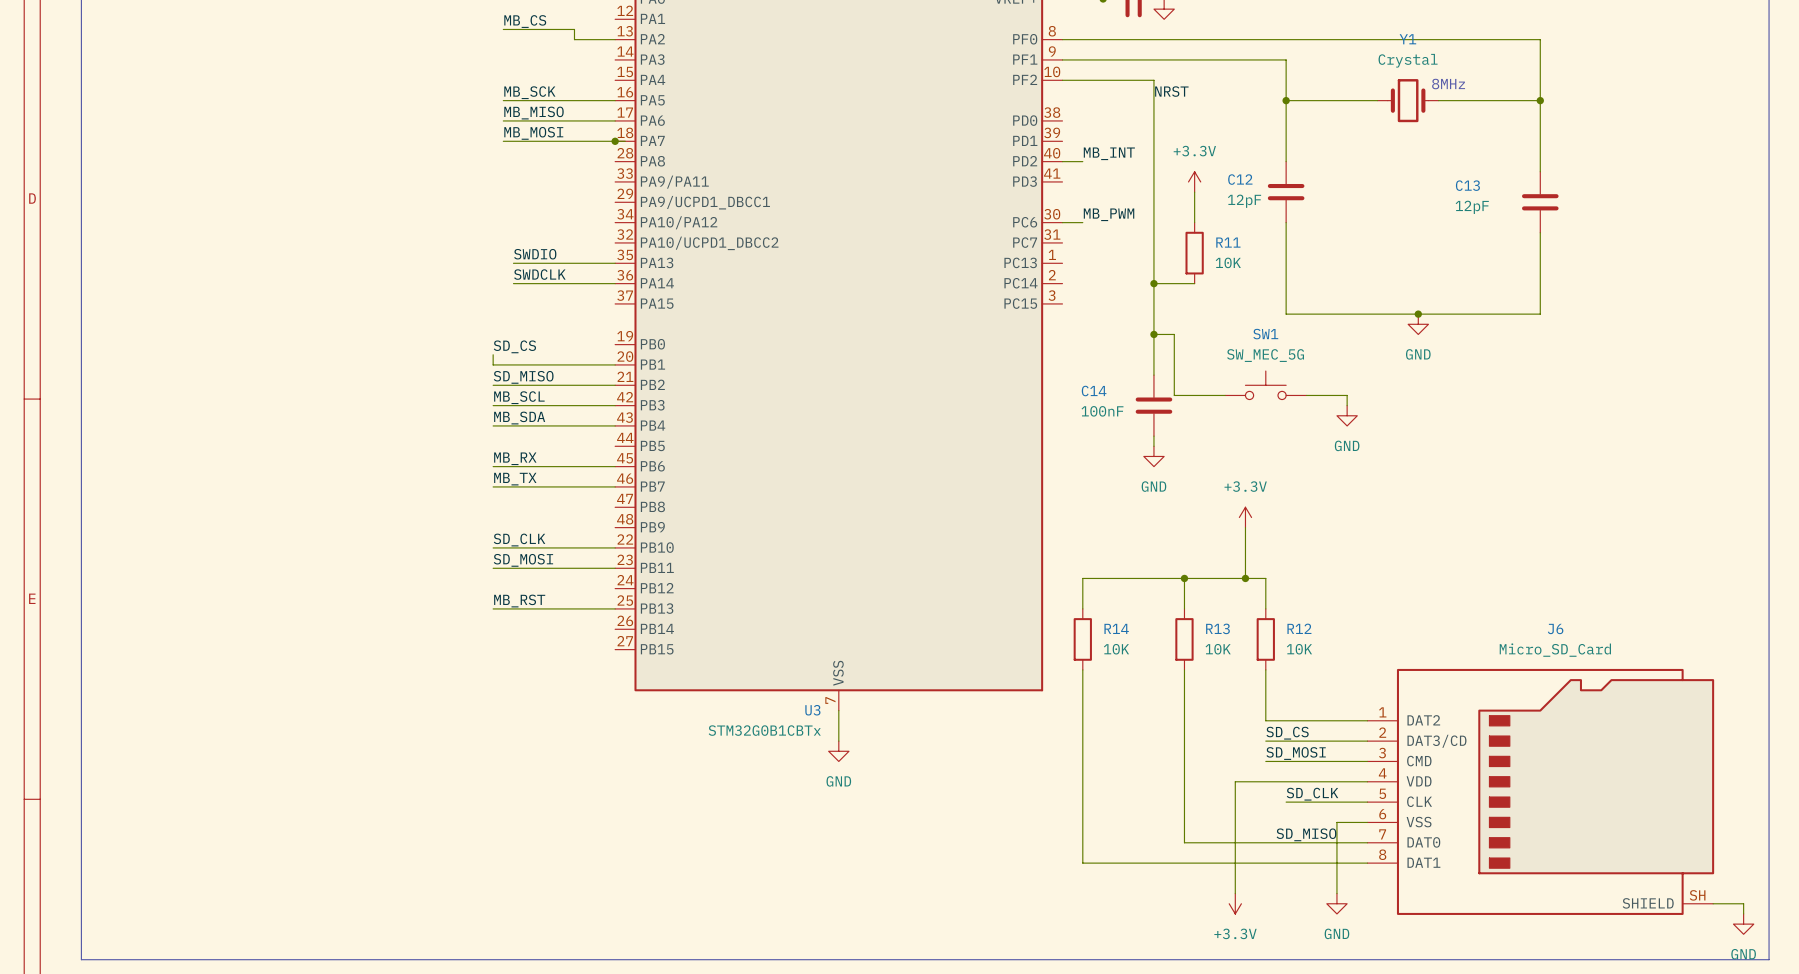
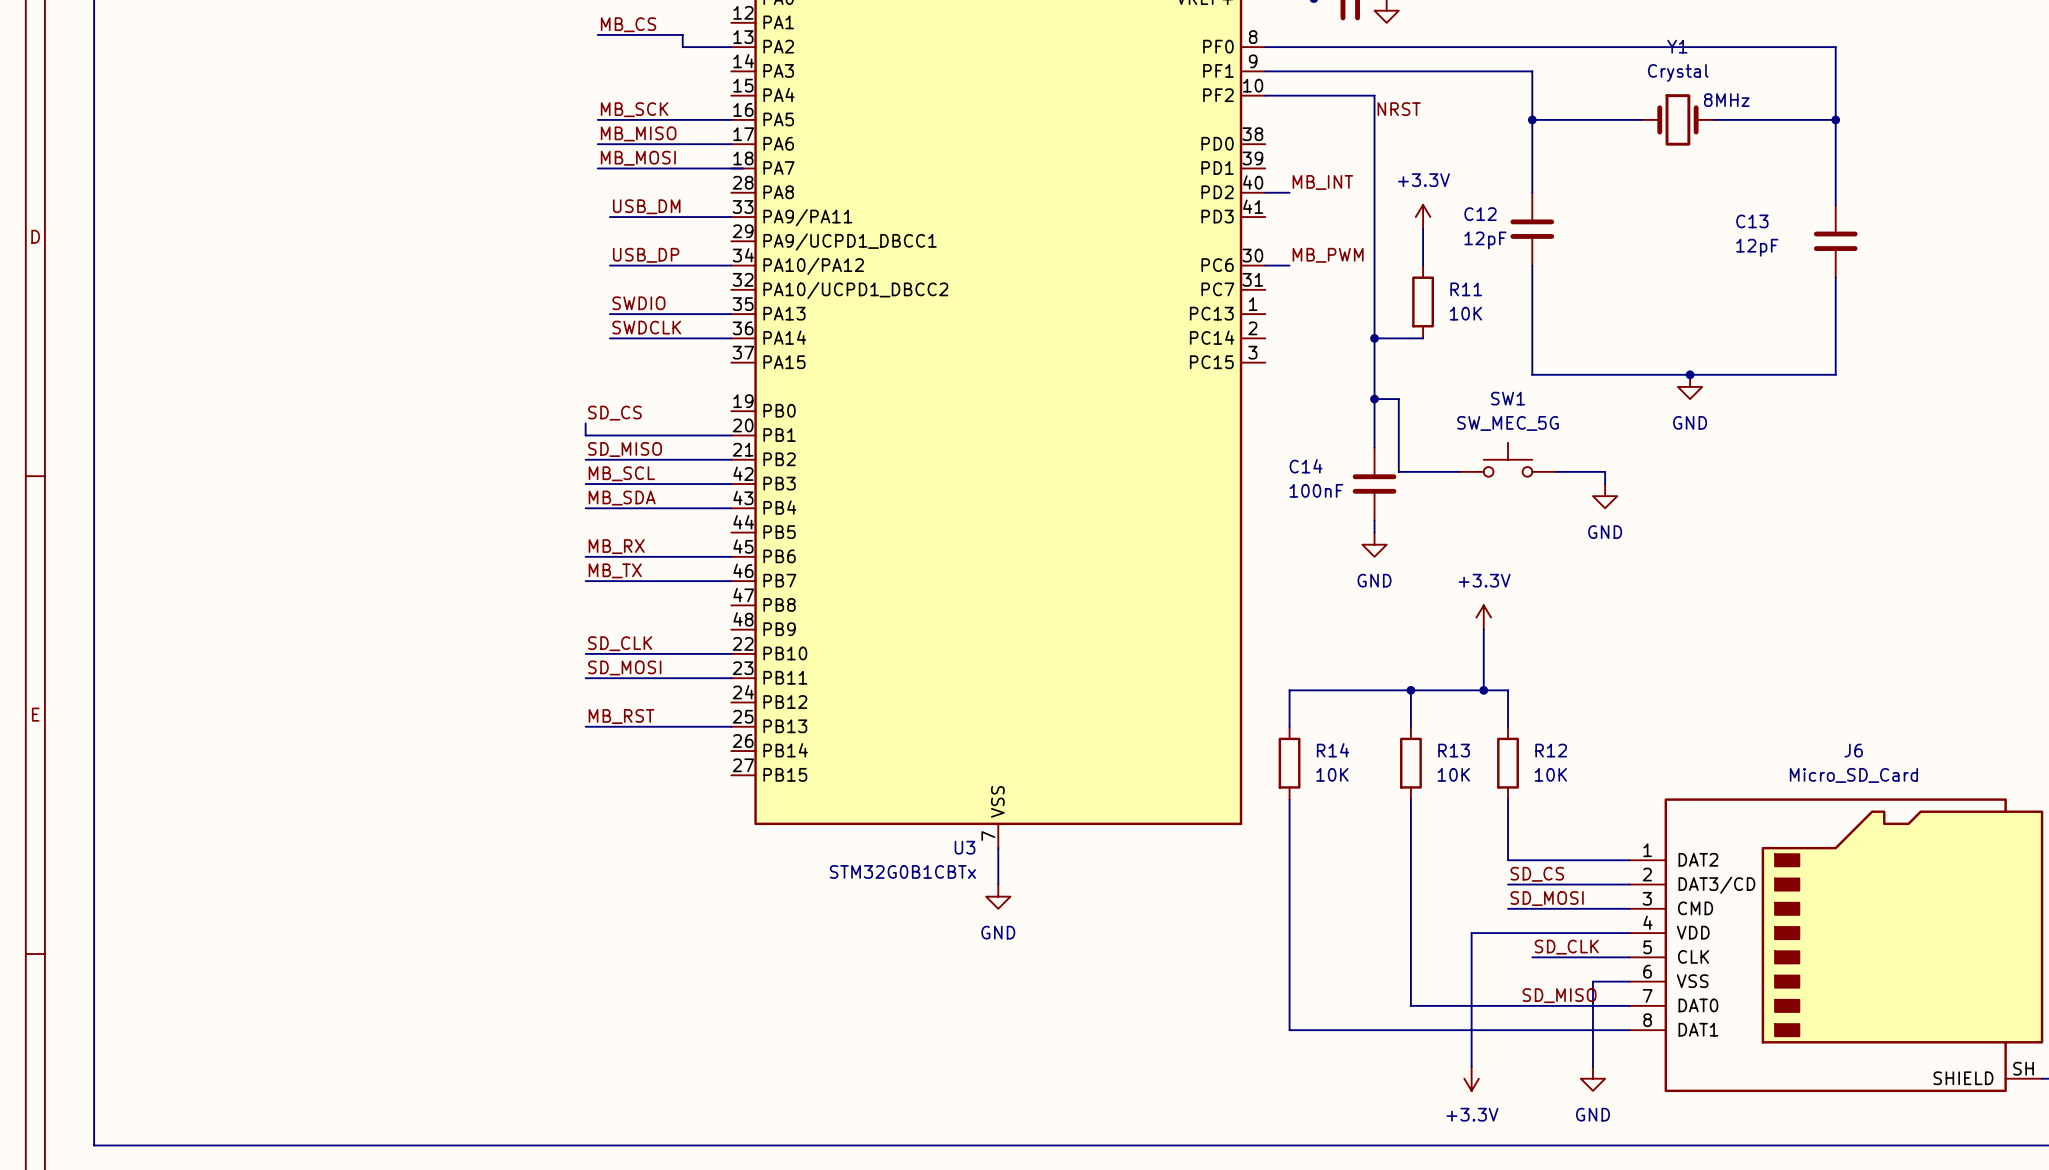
junction: (615, 141) -> none
label: none -> USB_DM (646, 206)
wire: none -> (609, 217) (731, 217)
label: none -> USB_DP (646, 255)
wire: none -> (609, 265) (731, 265)

